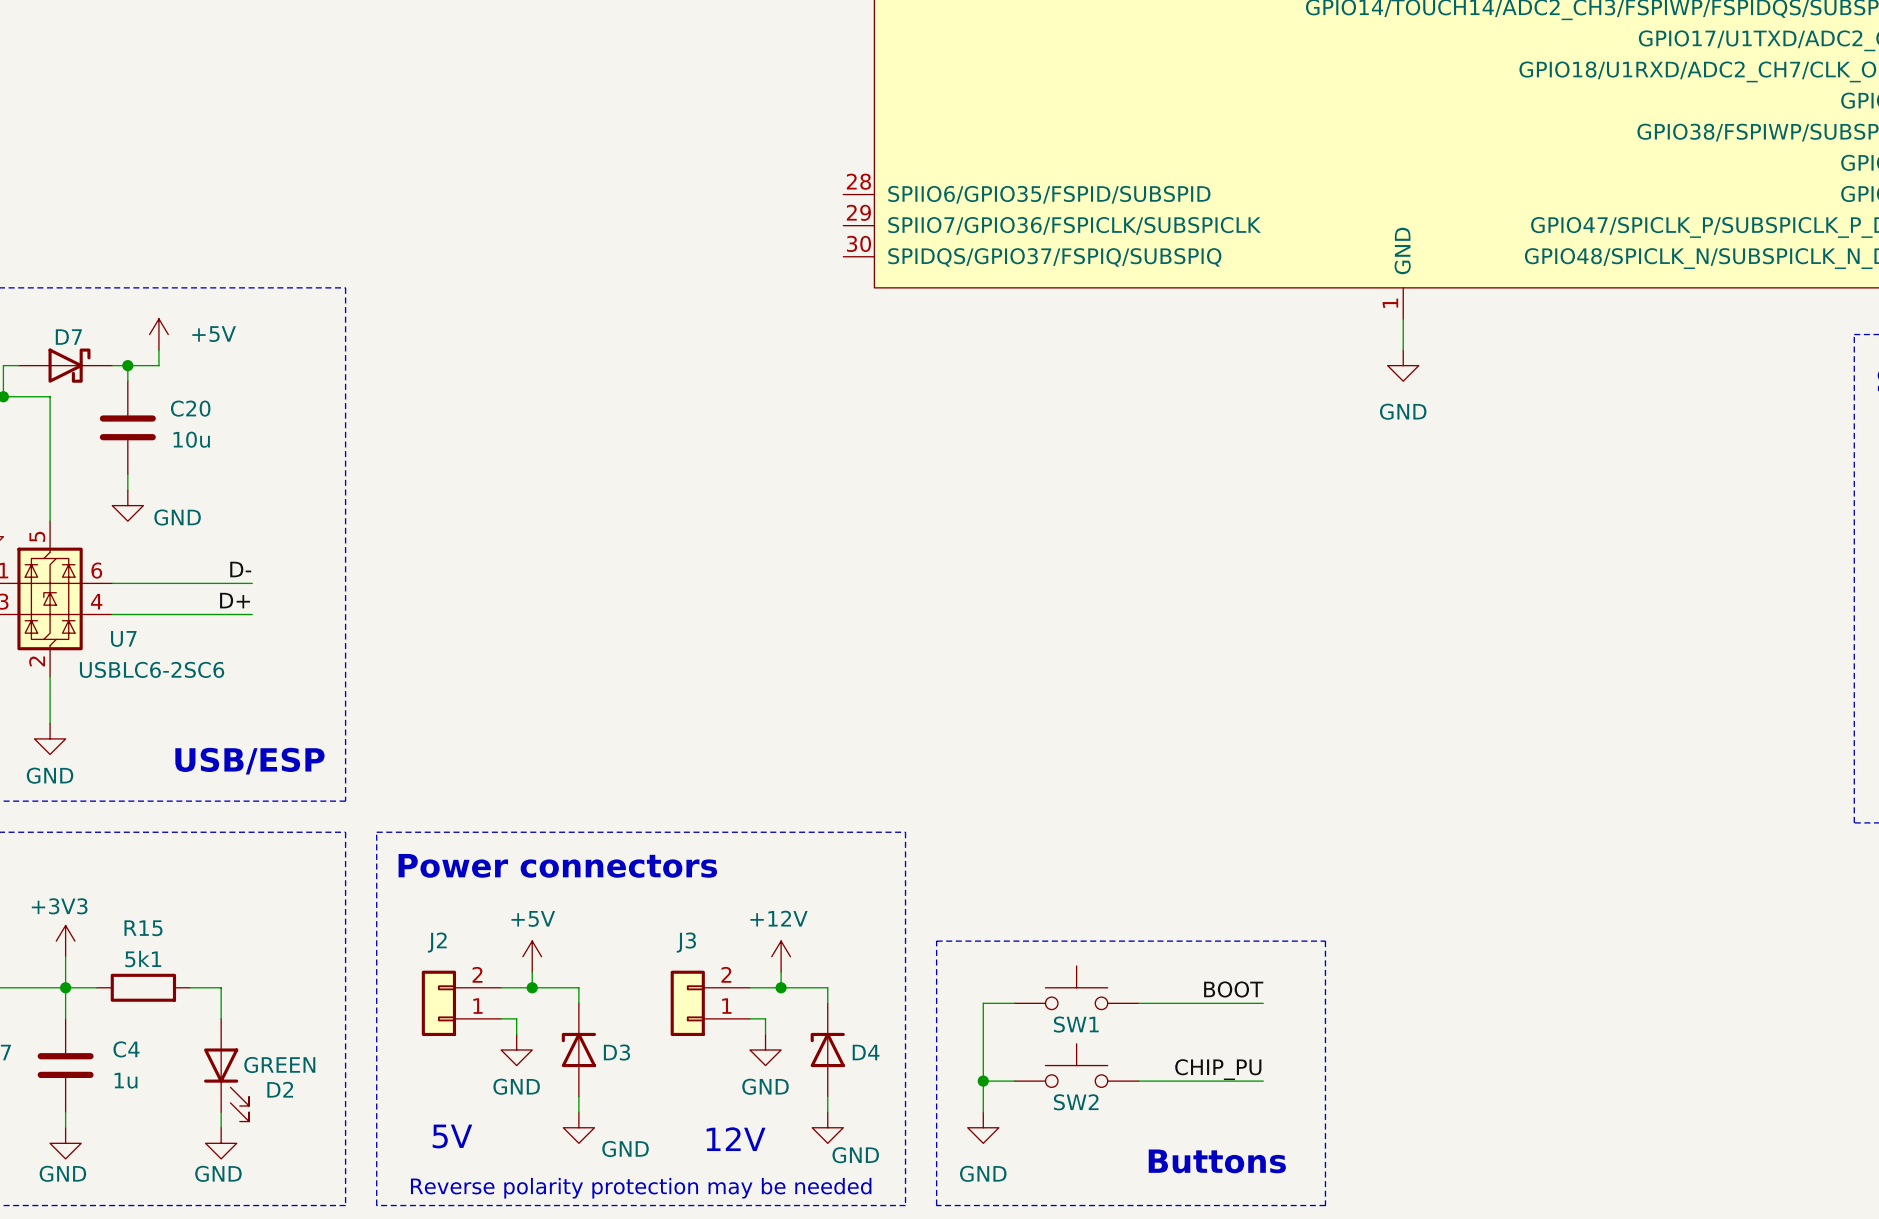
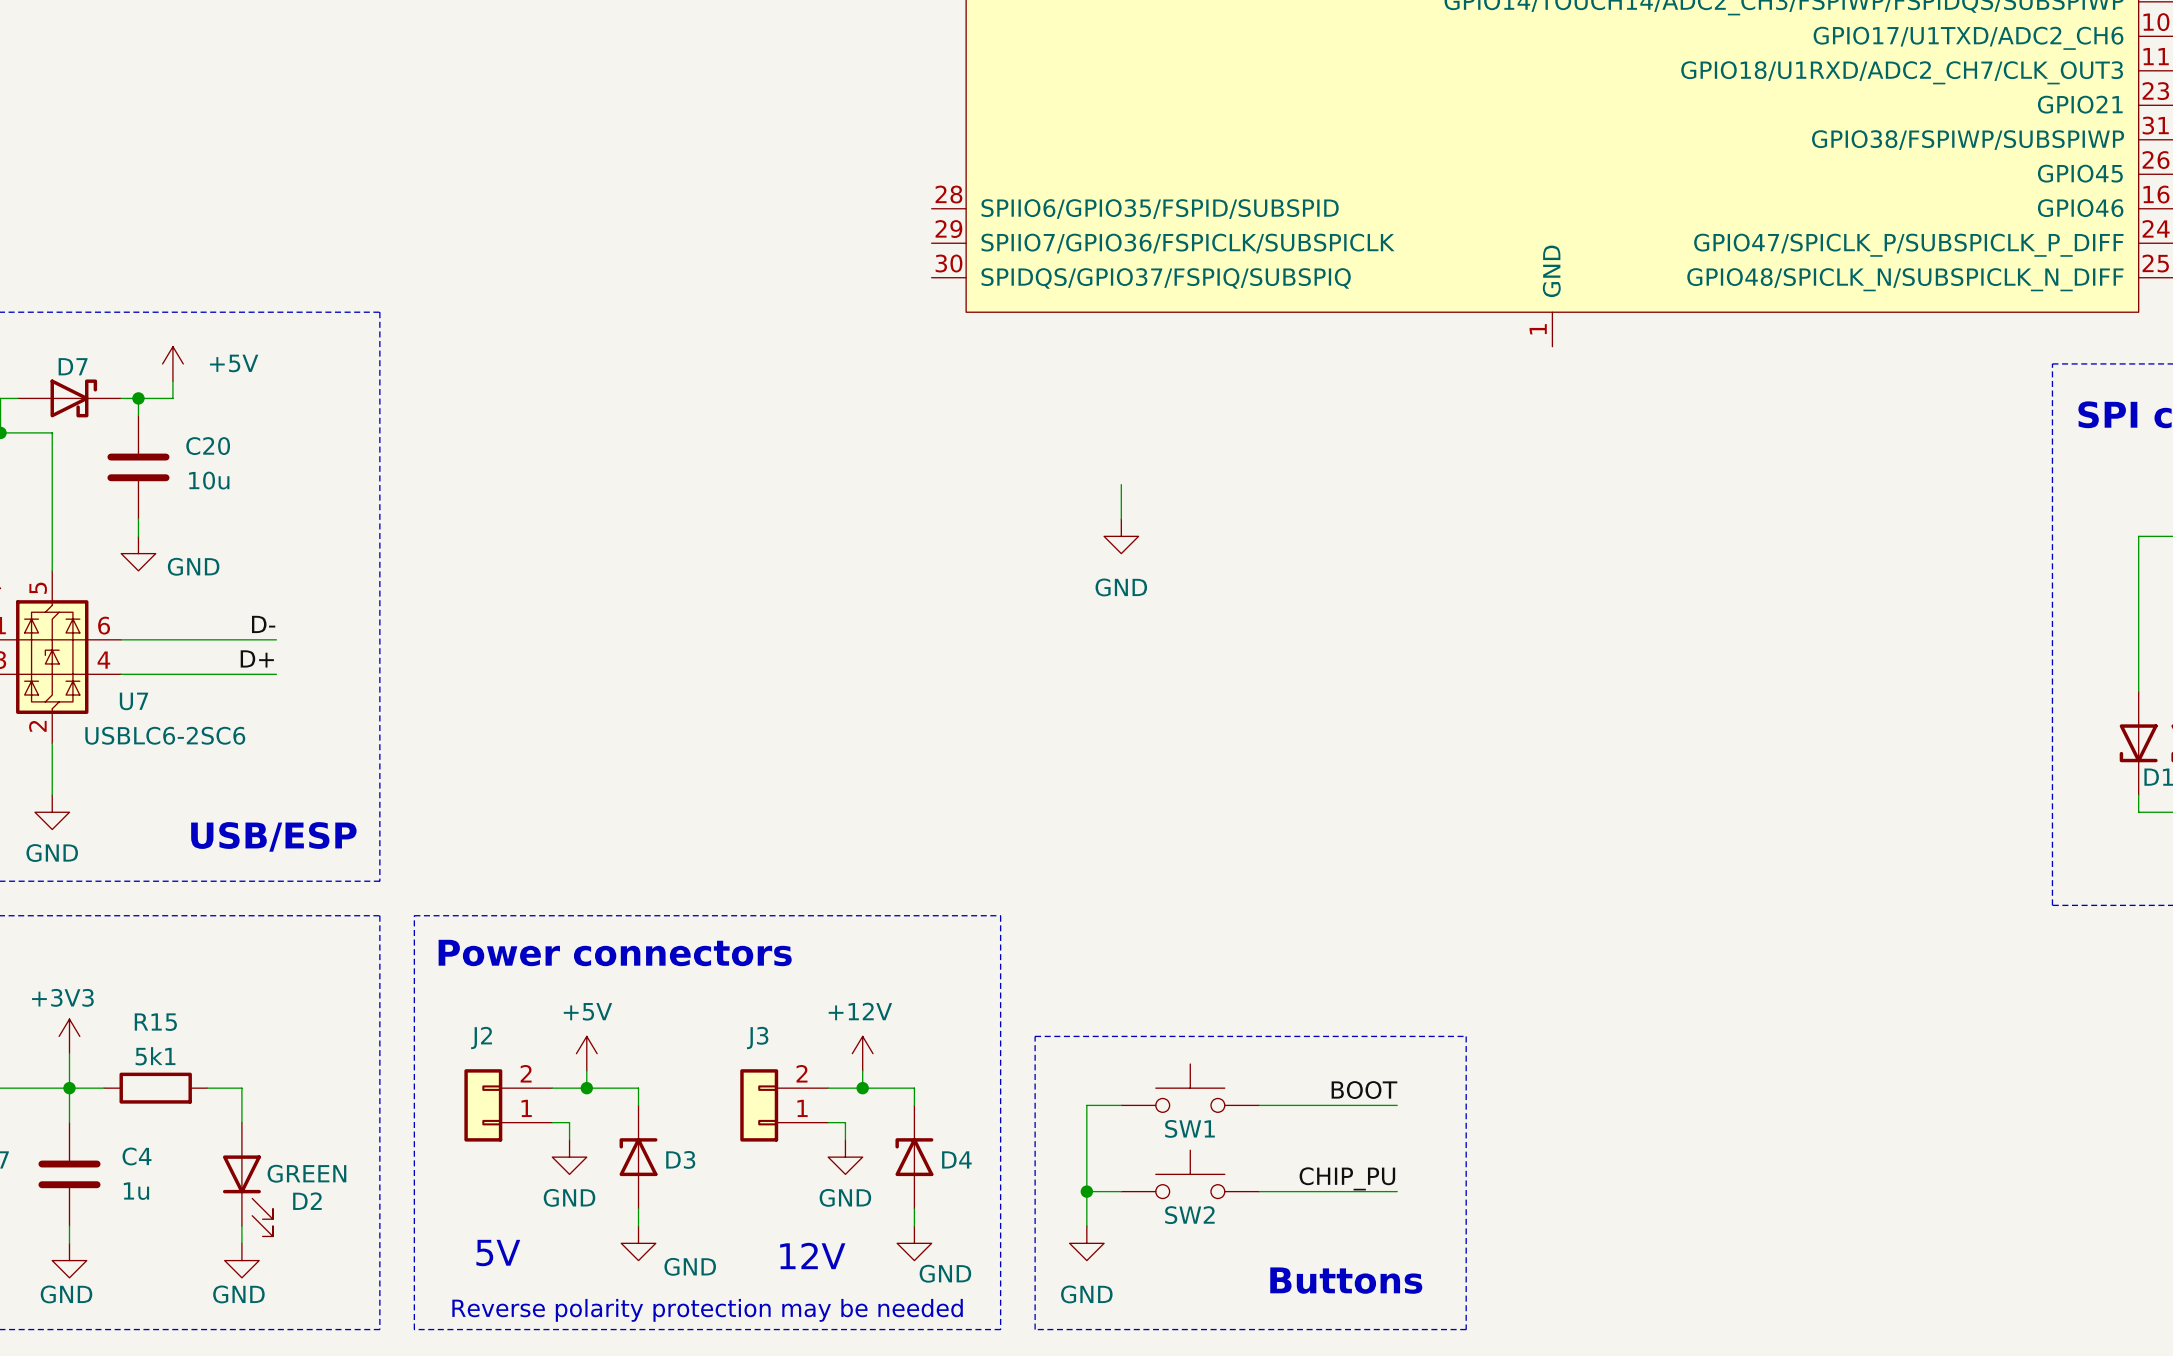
wire: (1403, 318) (1403, 350) -> none
power symbol: GND (1403, 365) -> none
wire: none -> (1121, 484) (1121, 519)
power symbol: none -> GND (1121, 536)

